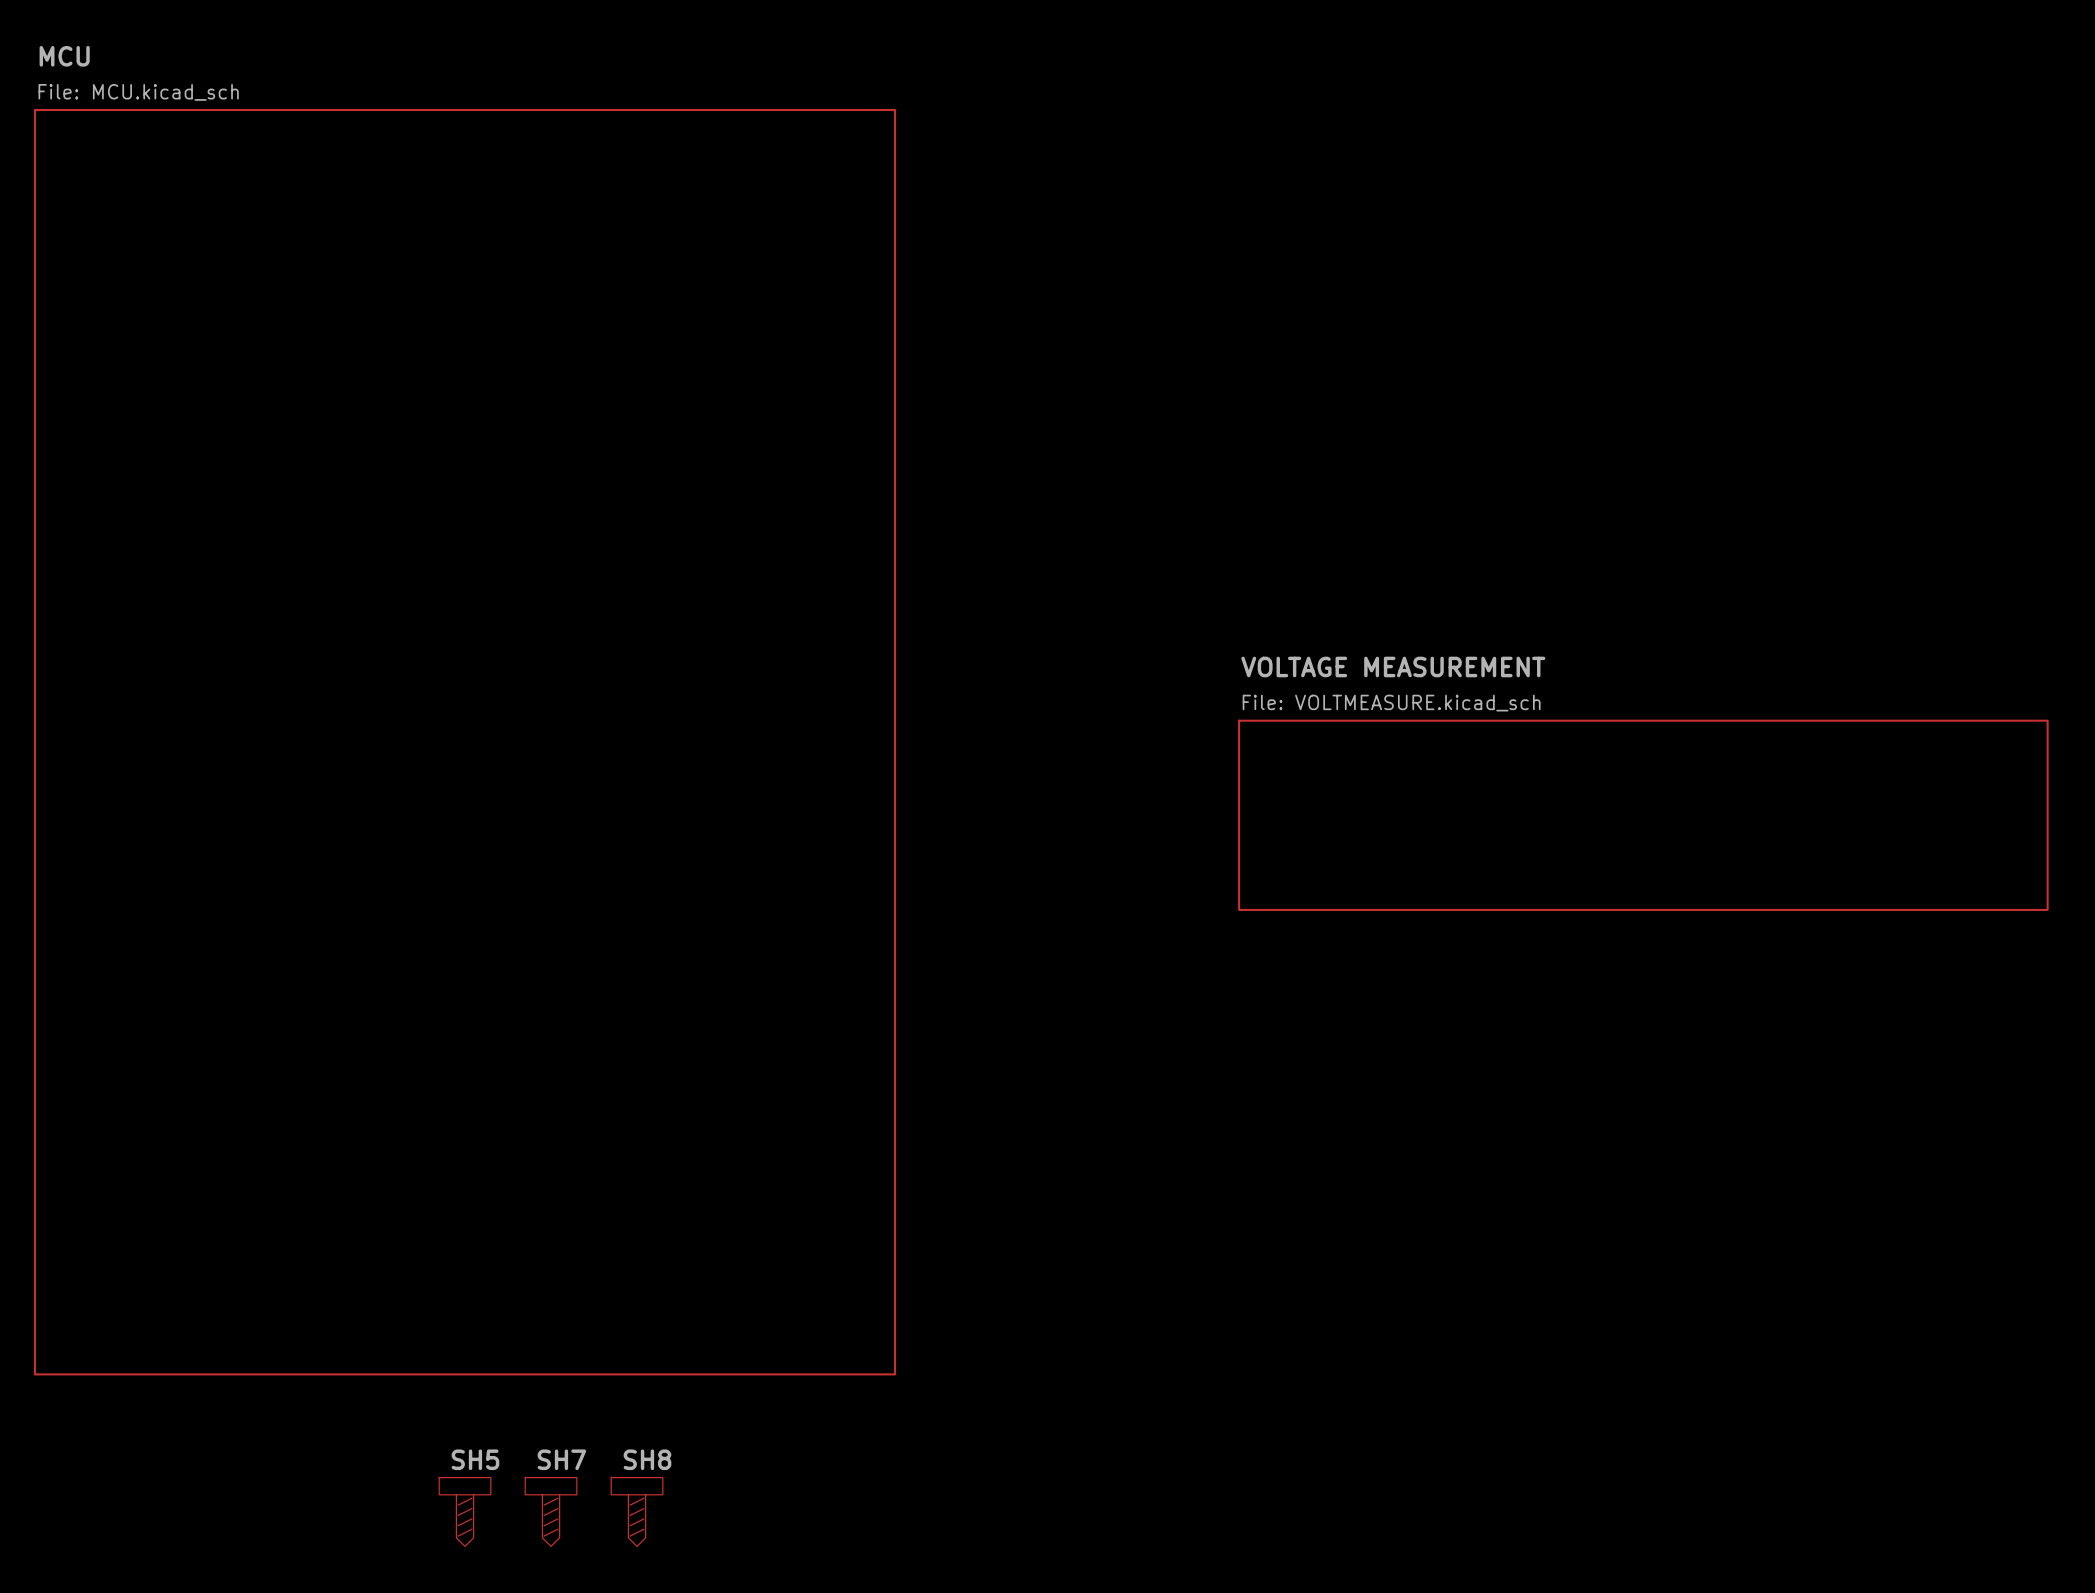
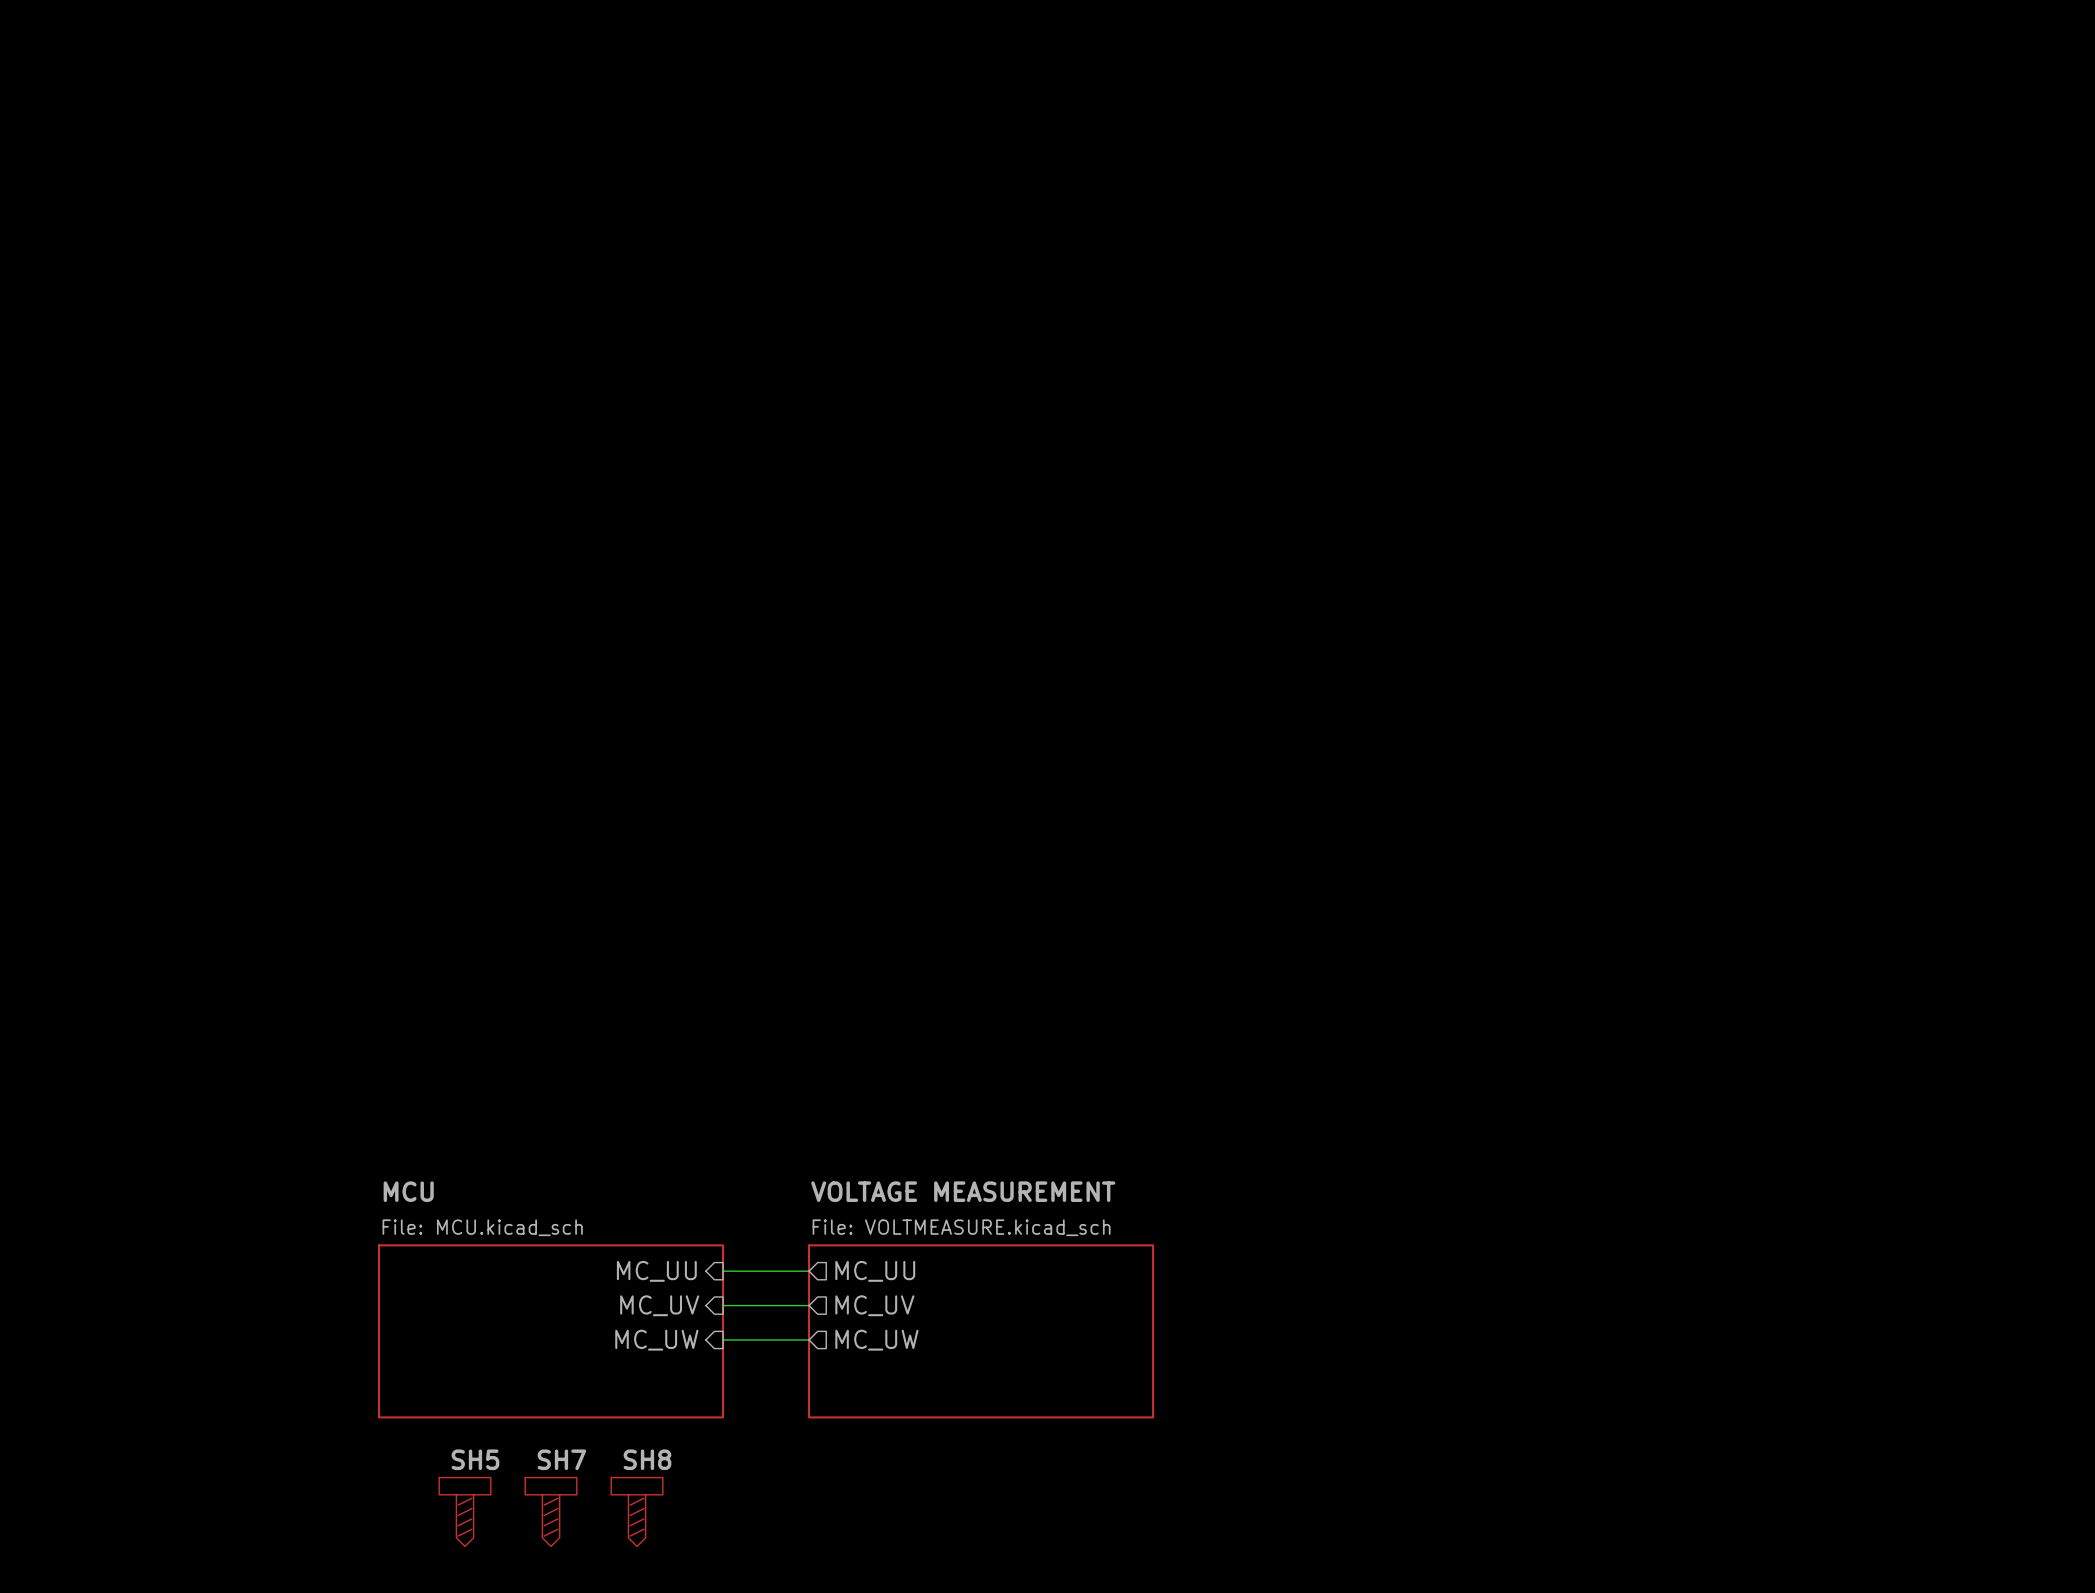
sheet MCU: File: MCU.kicad_sch (465, 742) -> none
sheet VOLTAGE MEASUREMENT: File: VOLTMEASURE.kicad_sch (1643, 815) -> none
sheet pin: none -> MC_UU (656, 1271)
wire: none -> (723, 1271) (809, 1271)
sheet pin: none -> MC_UU (875, 1271)
sheet pin: none -> MC_UV (659, 1305)
wire: none -> (723, 1305) (809, 1305)
sheet pin: none -> MC_UV (874, 1305)
sheet MCU: none -> File: MCU.kicad_sch (551, 1331)
sheet VOLTAGE MEASUREMENT: none -> File: VOLTMEASURE.kicad_sch (981, 1331)
wire: none -> (723, 1339) (809, 1339)
sheet pin: none -> MC_UW (656, 1340)
sheet pin: none -> MC_UW (876, 1340)

